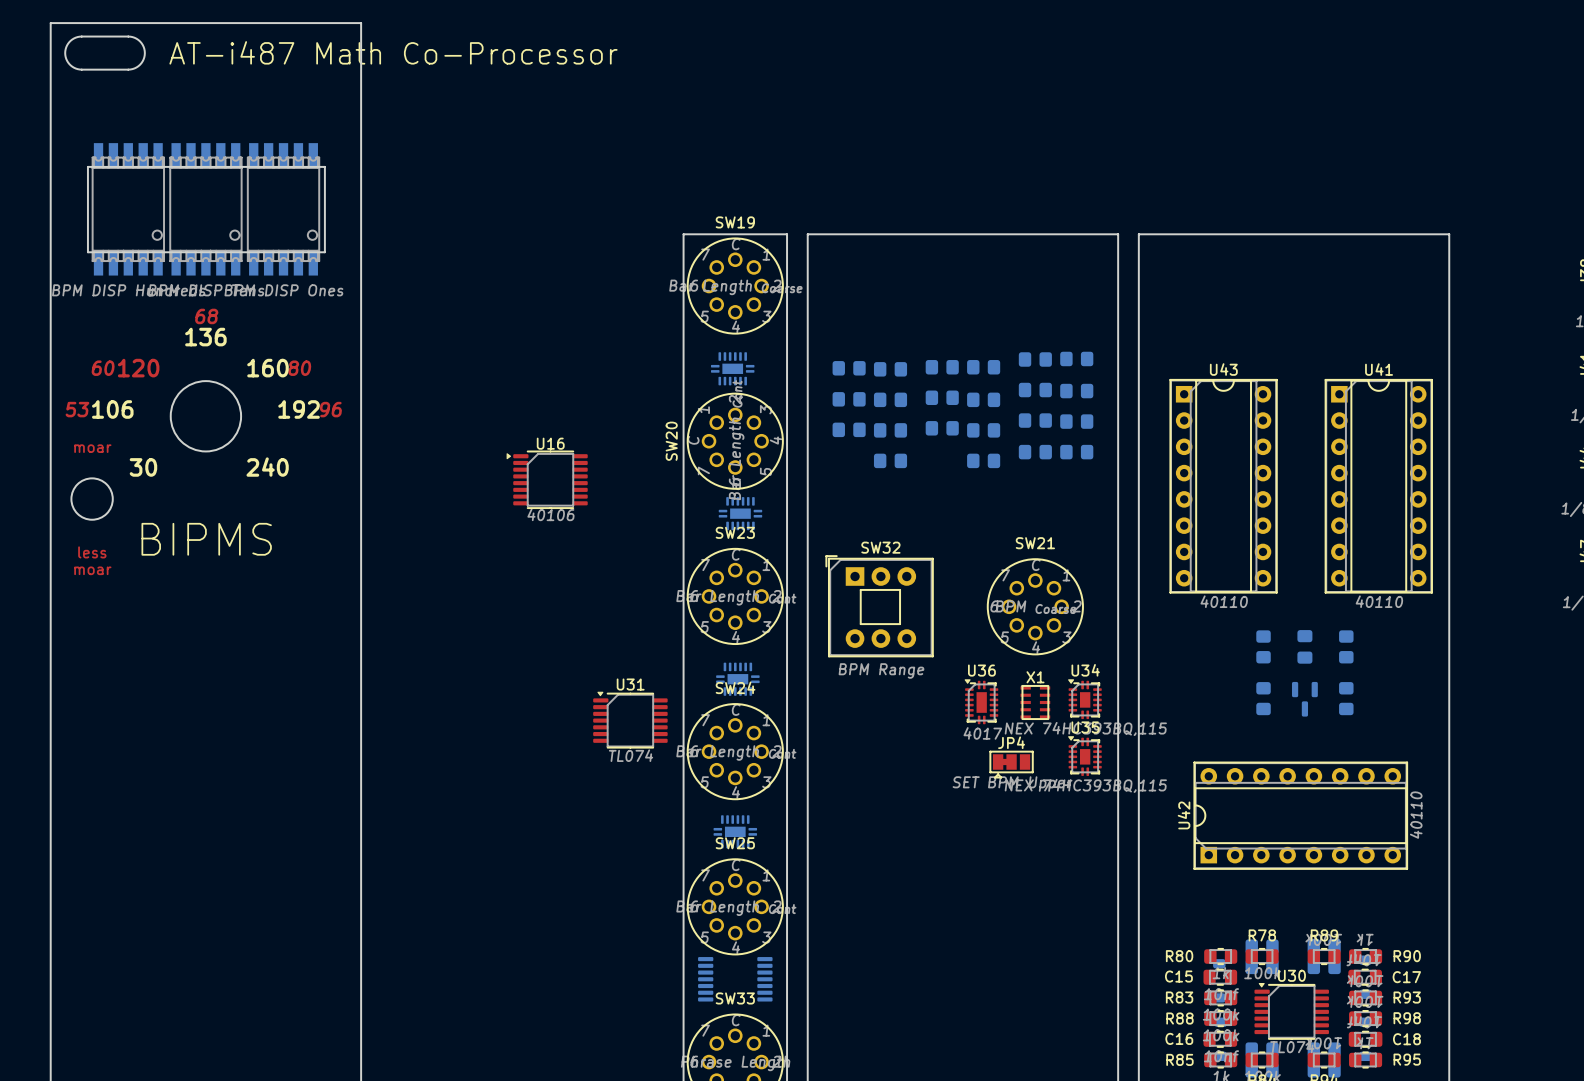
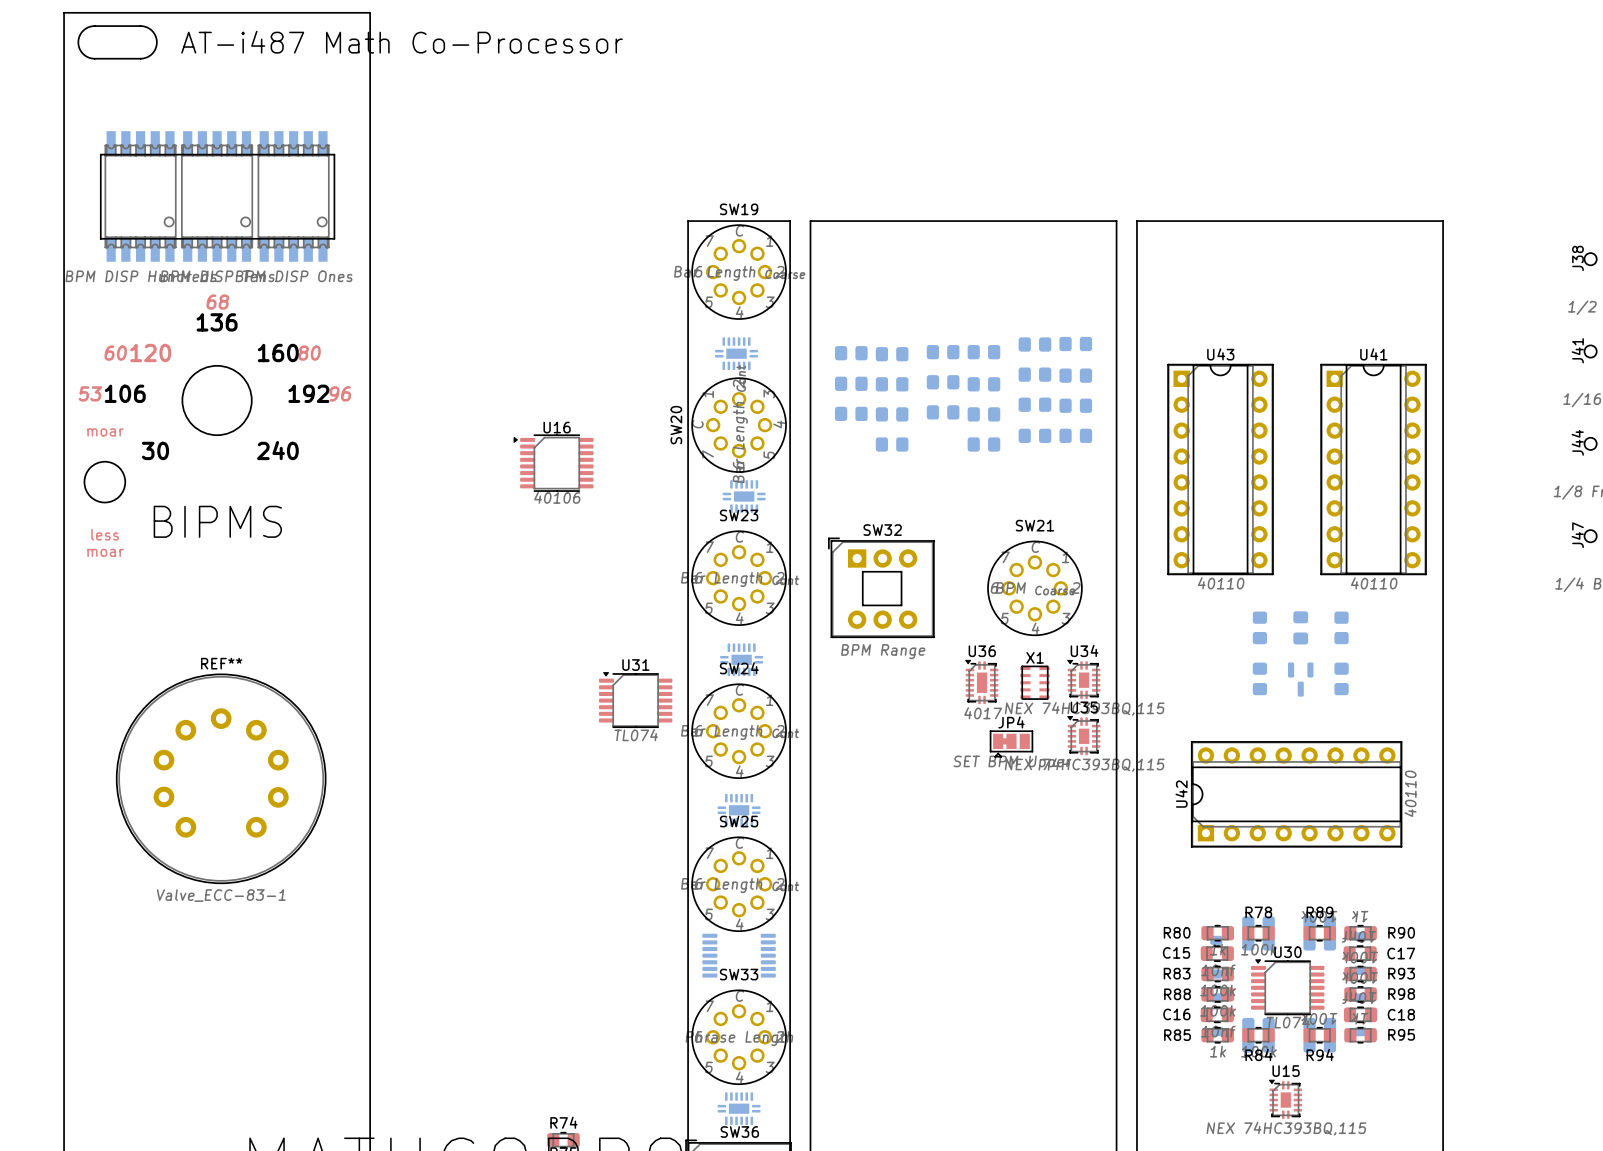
REF**: none -> Valve_ECC-83-1 (221, 778)

